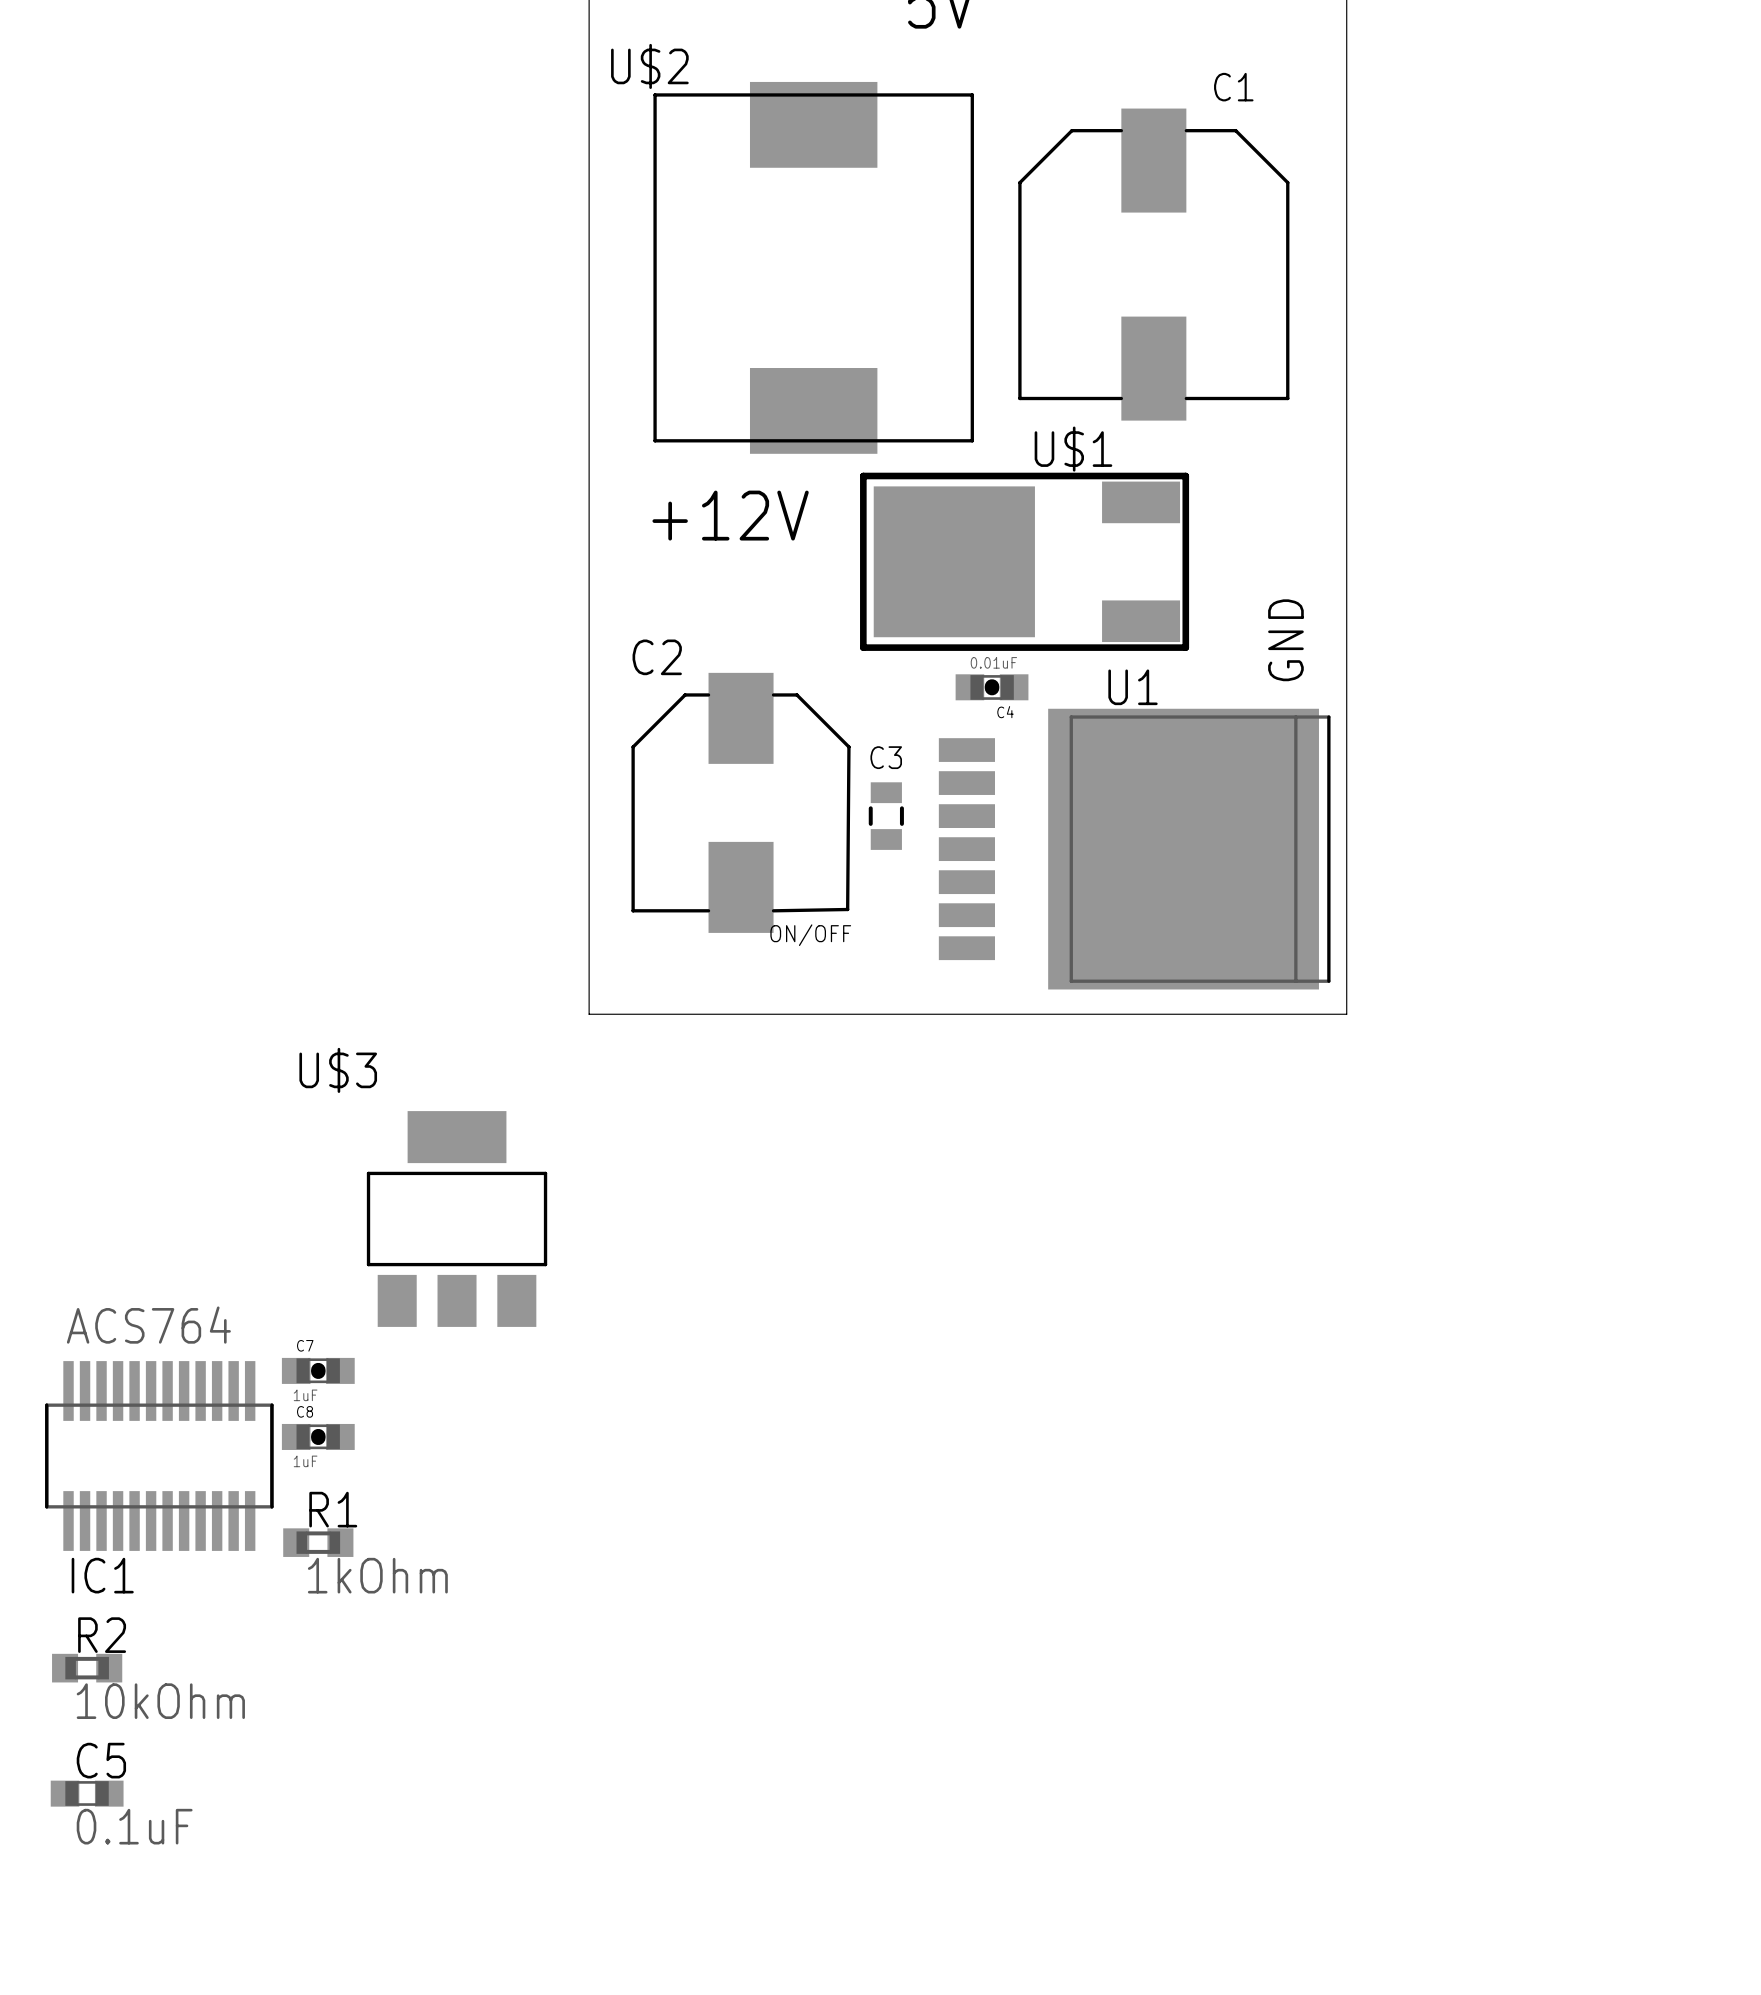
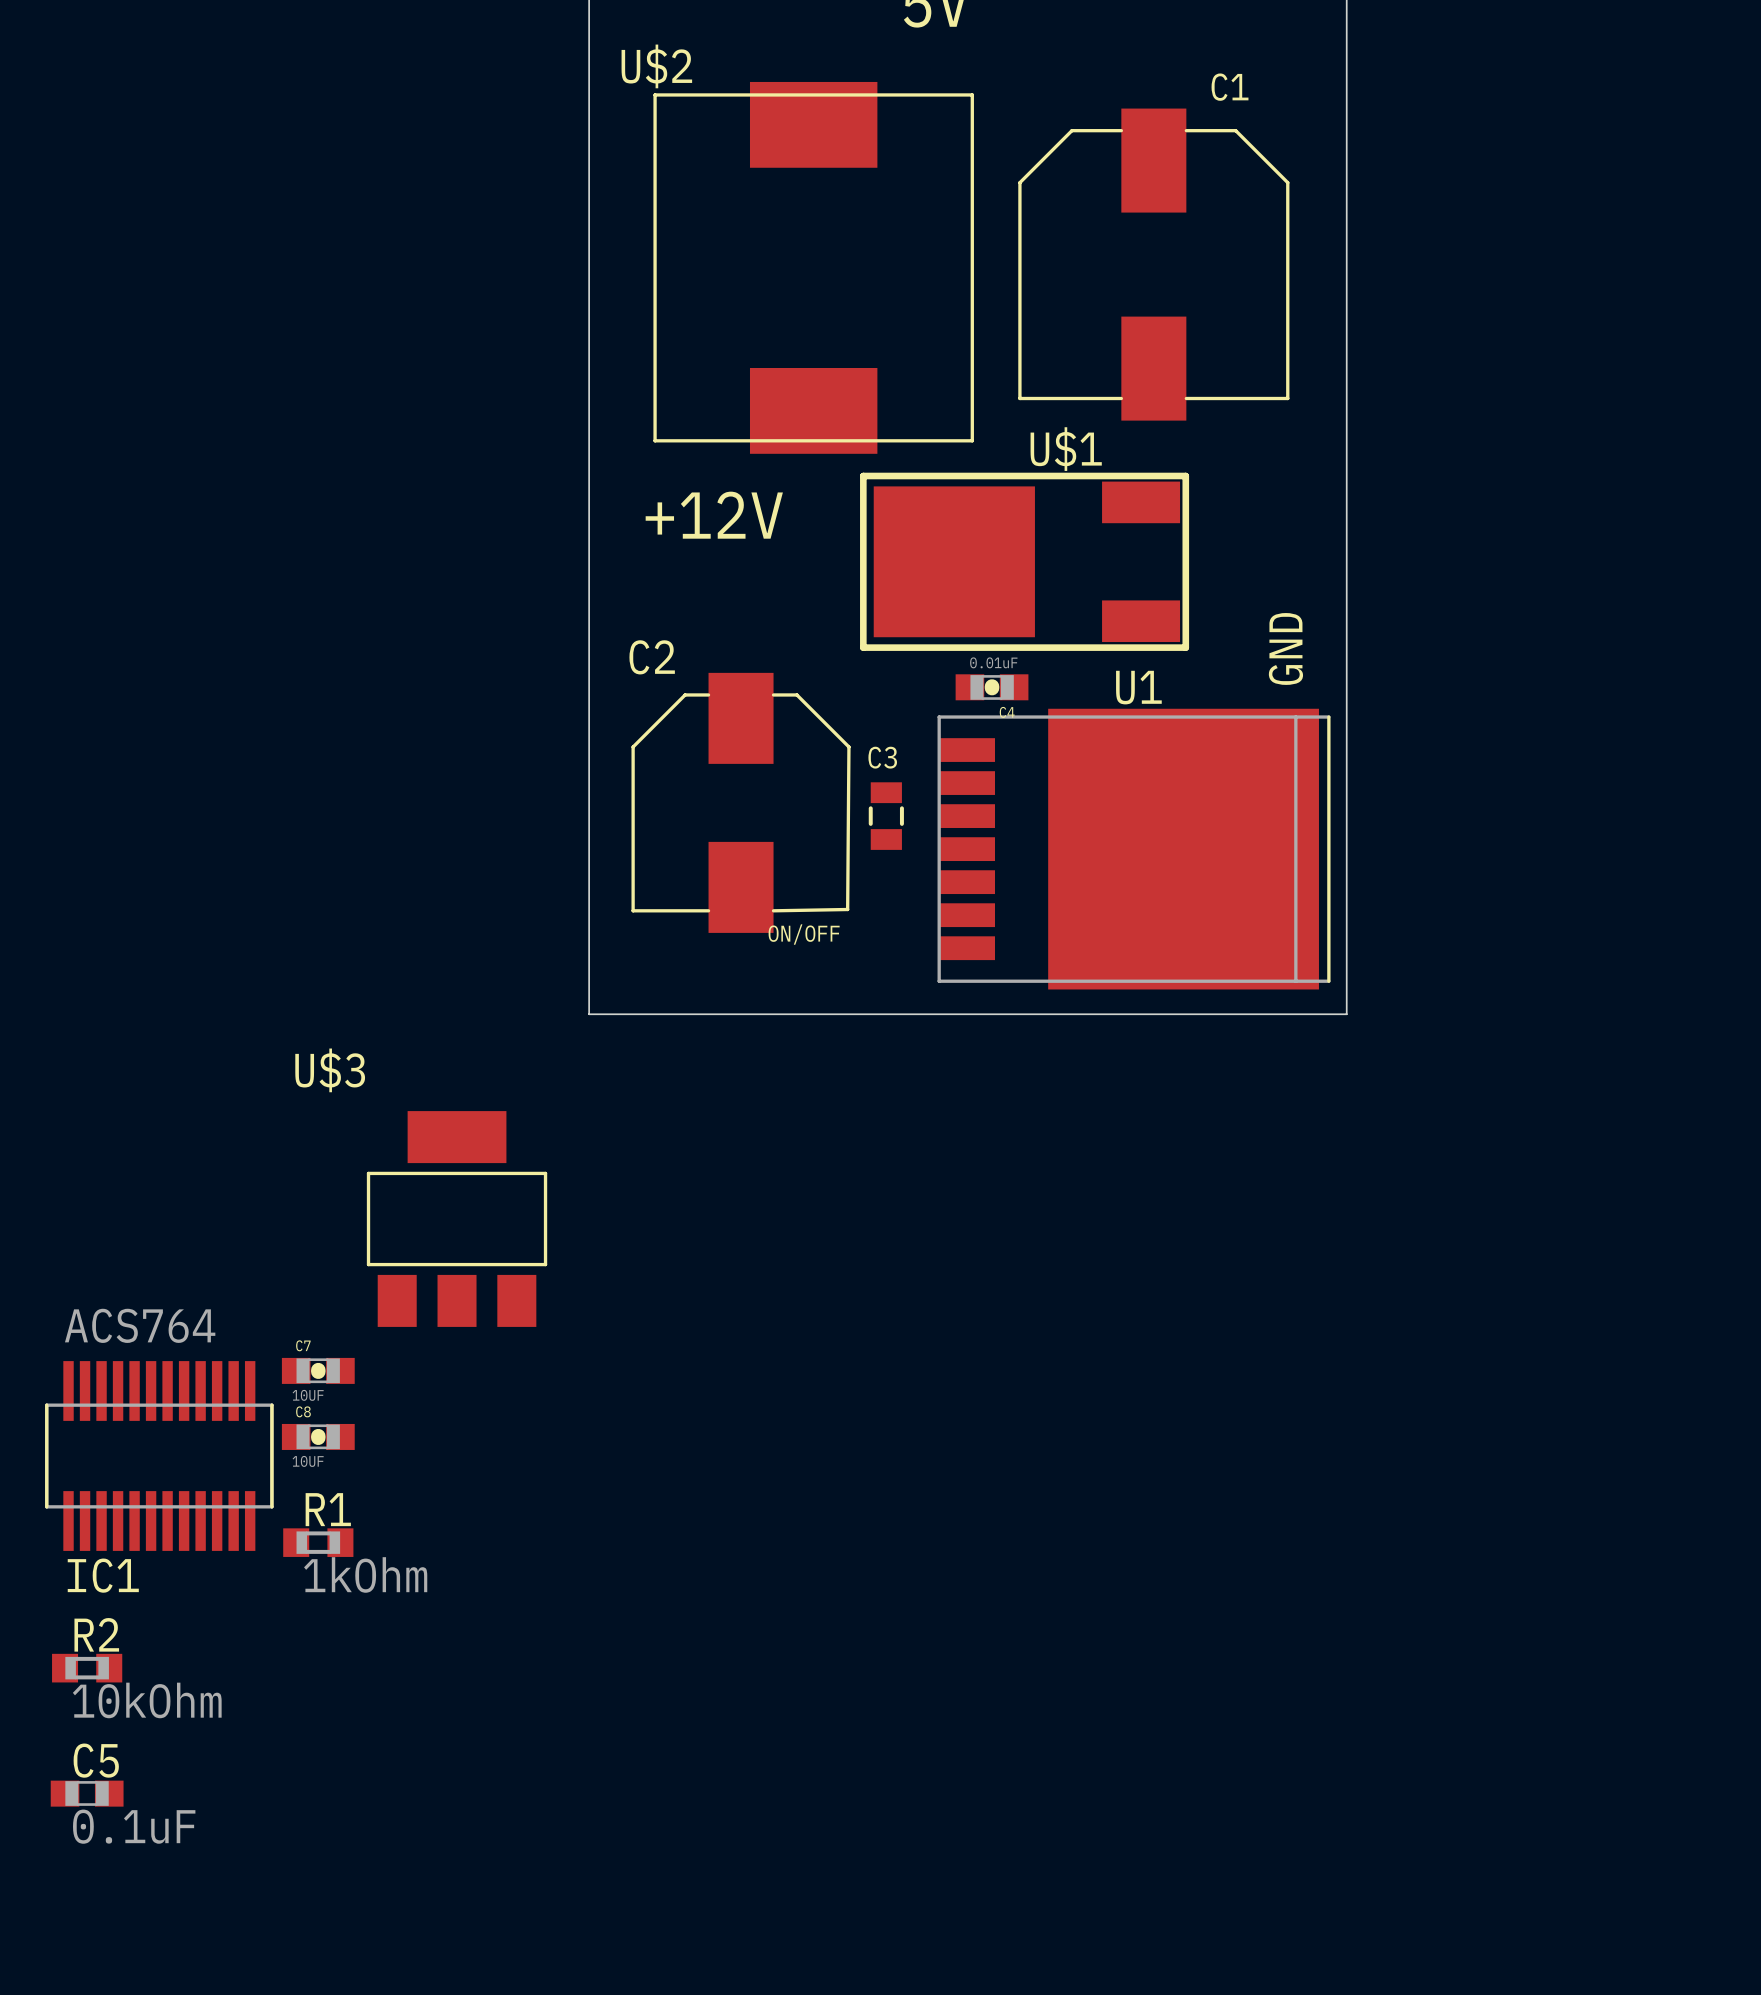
U1 footprint: [938, 708, 1331, 990] -> [937, 708, 1331, 990]
C7 value: 1uF (305, 1395) -> 10UF (308, 1395)
C8 value: 1uF (305, 1461) -> 10UF (308, 1461)

